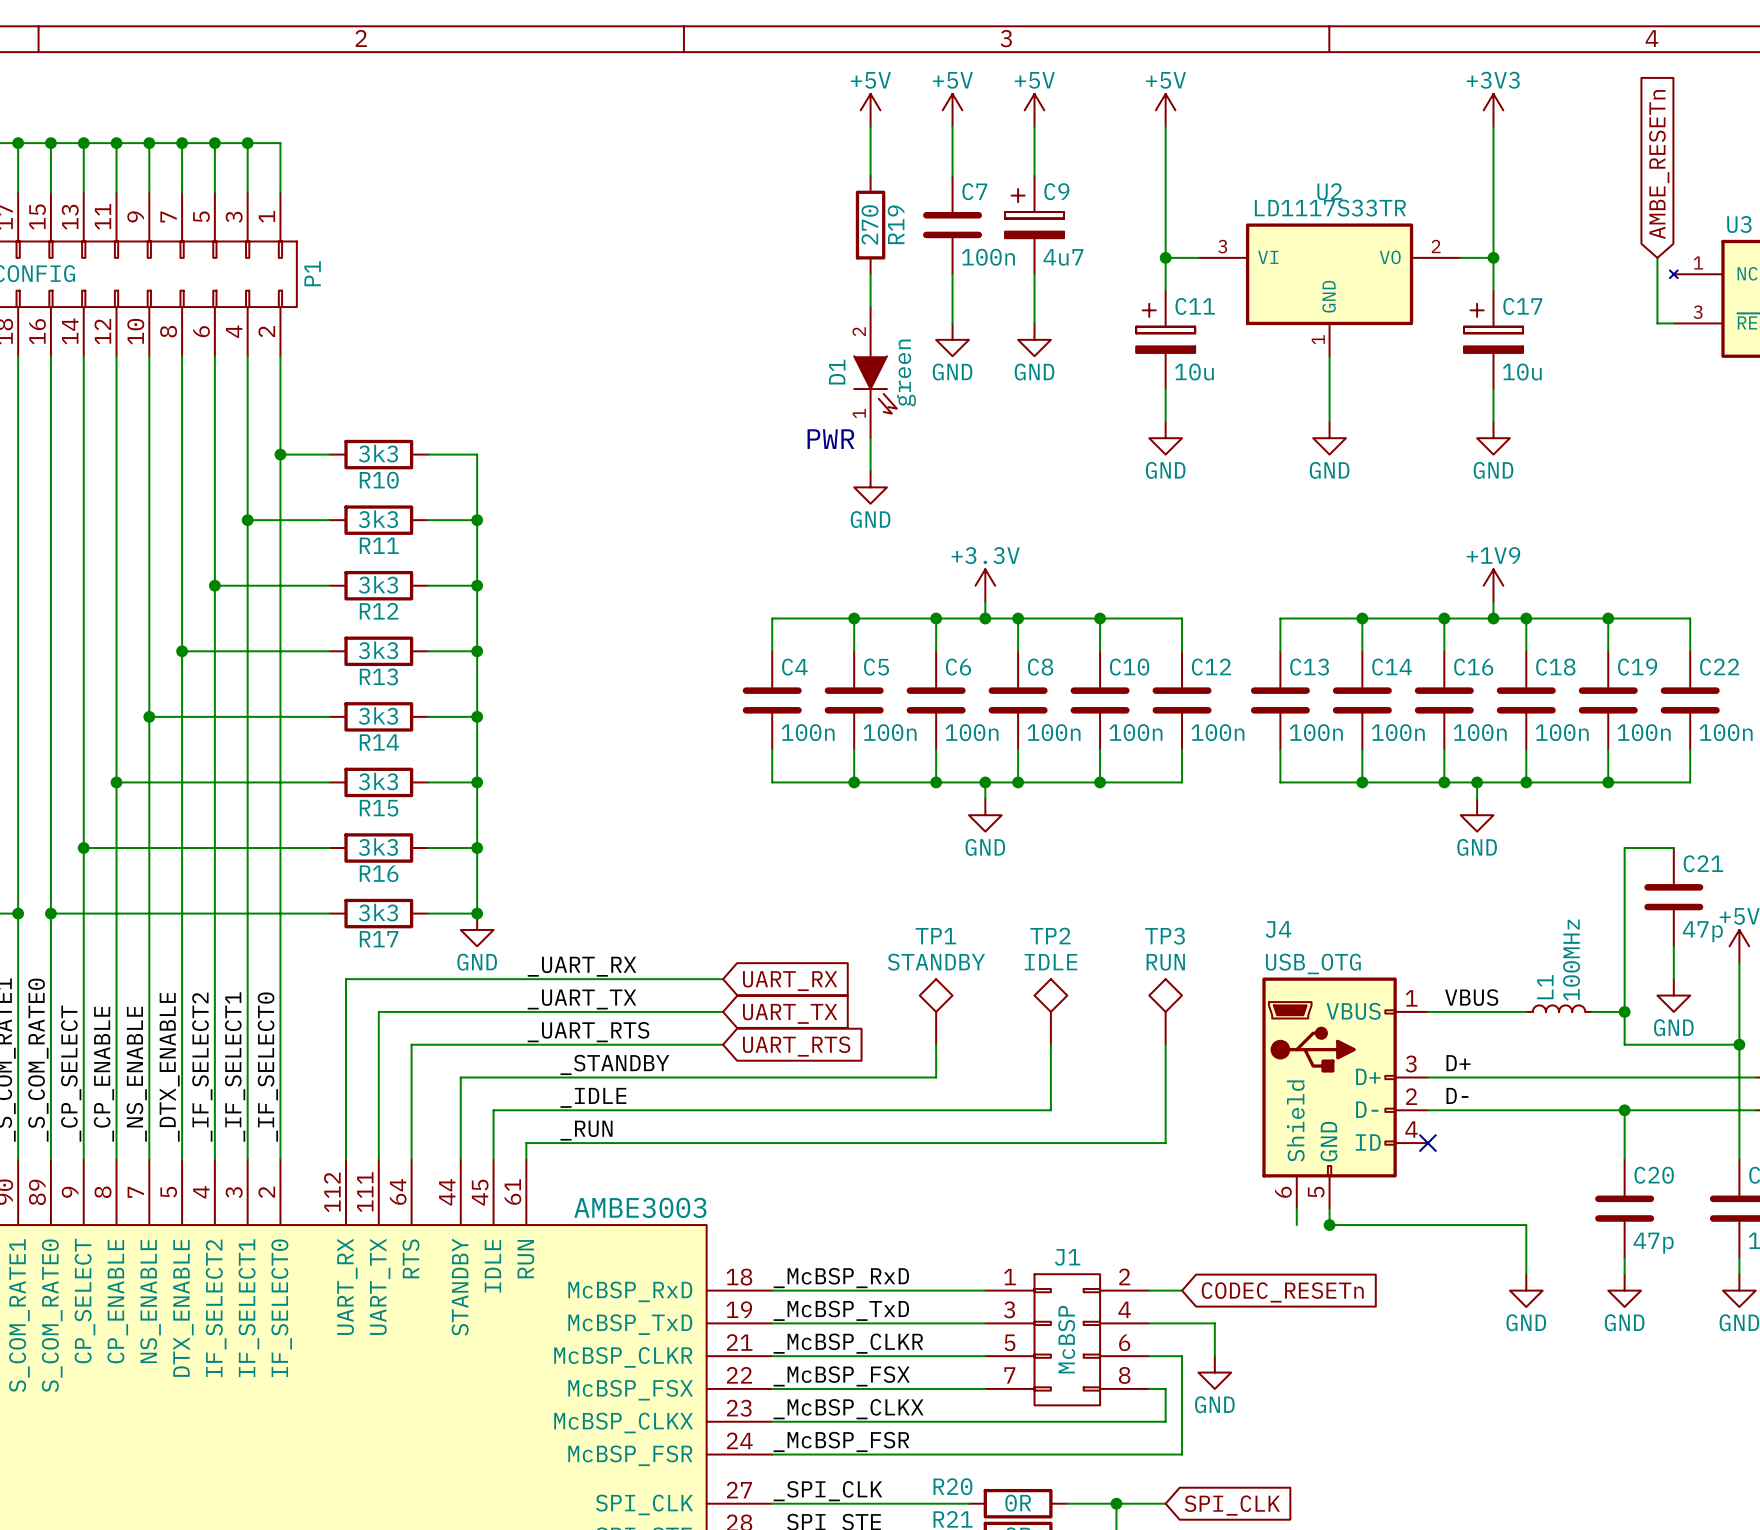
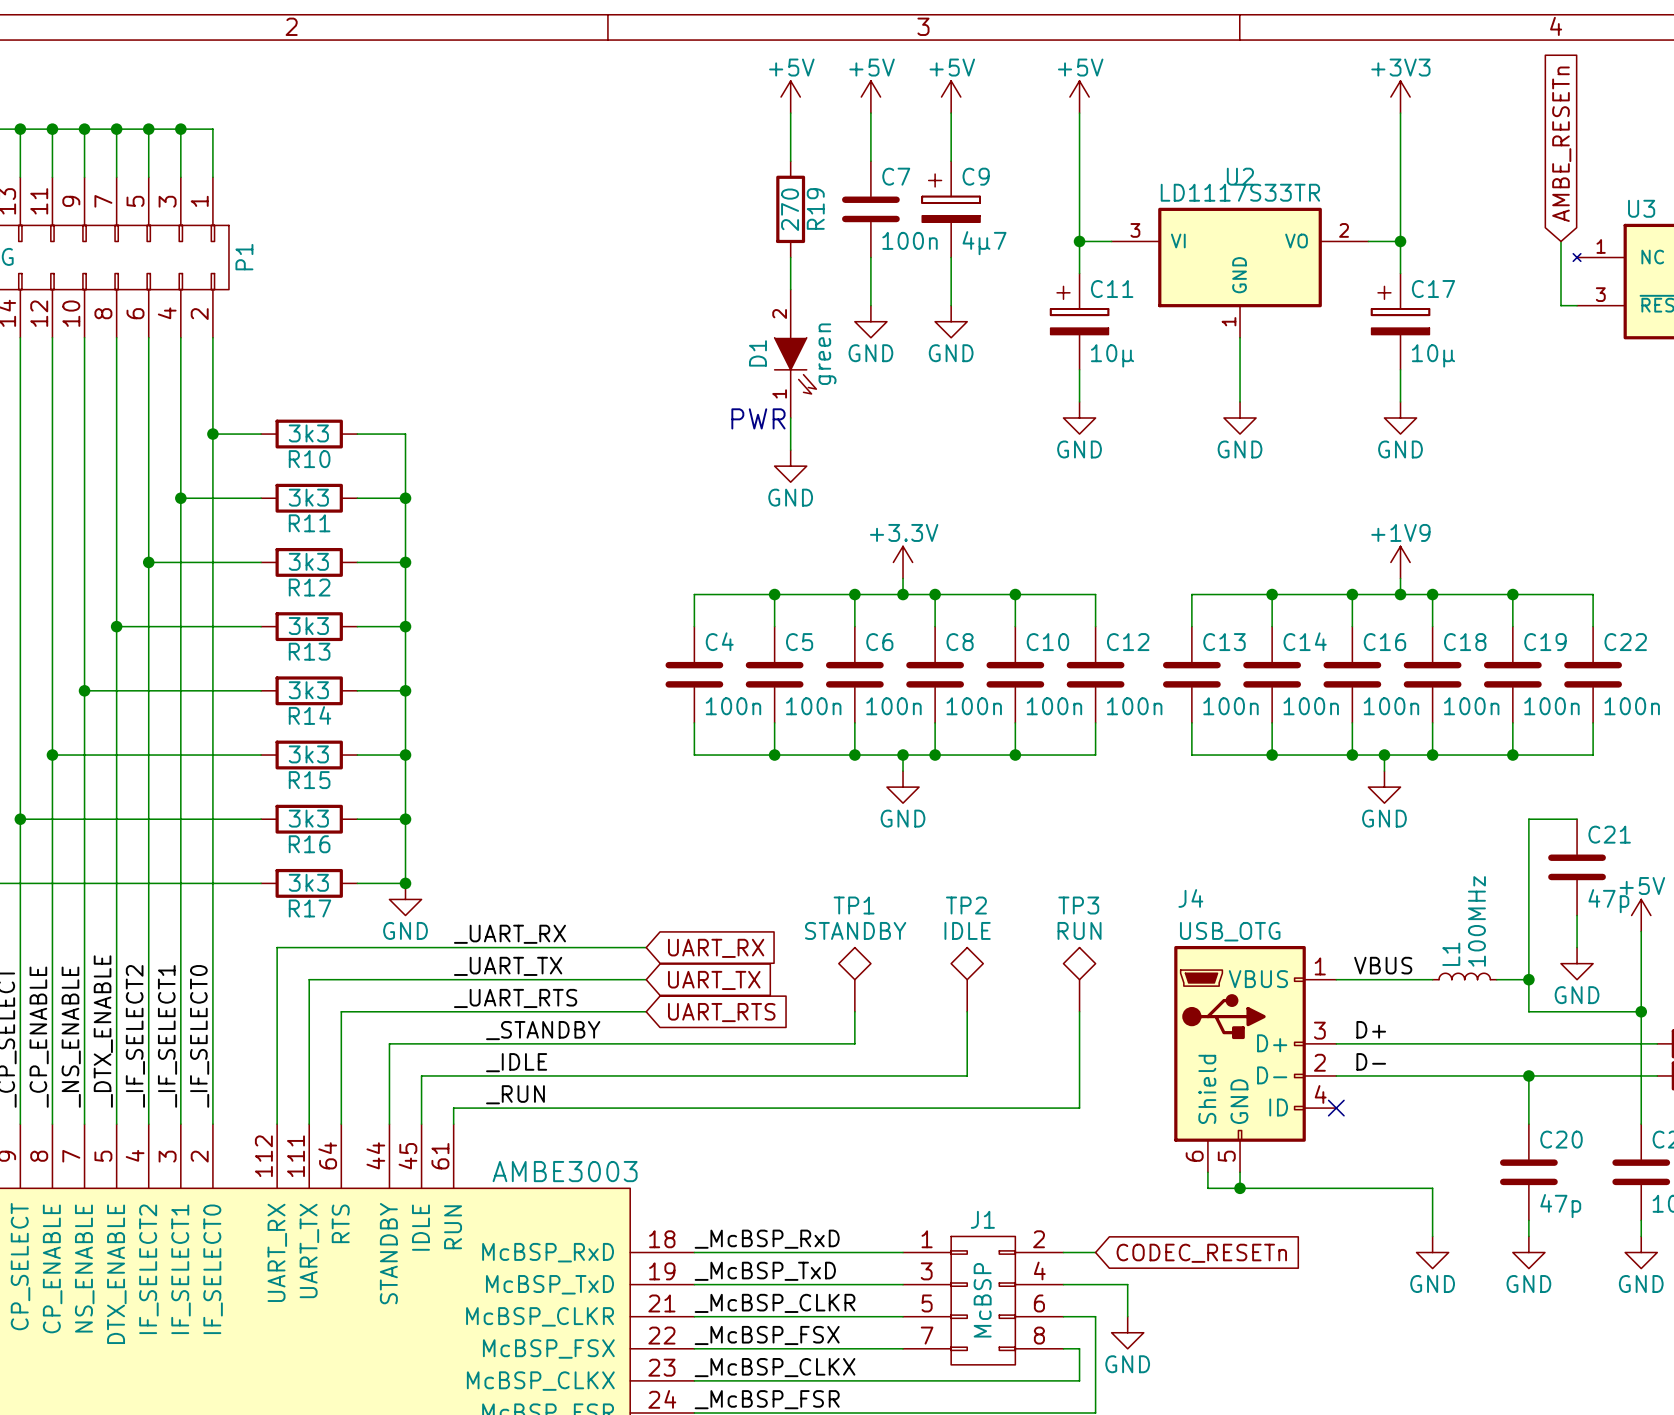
C9 value: 4u7 (1063, 257) -> 4µ7 (984, 243)
C11 value: 10u (1194, 372) -> 10µ (1112, 355)
C17 value: 10u (1522, 372) -> 10µ (1433, 355)
wire: none -> (1207, 1188) (1240, 1188)

